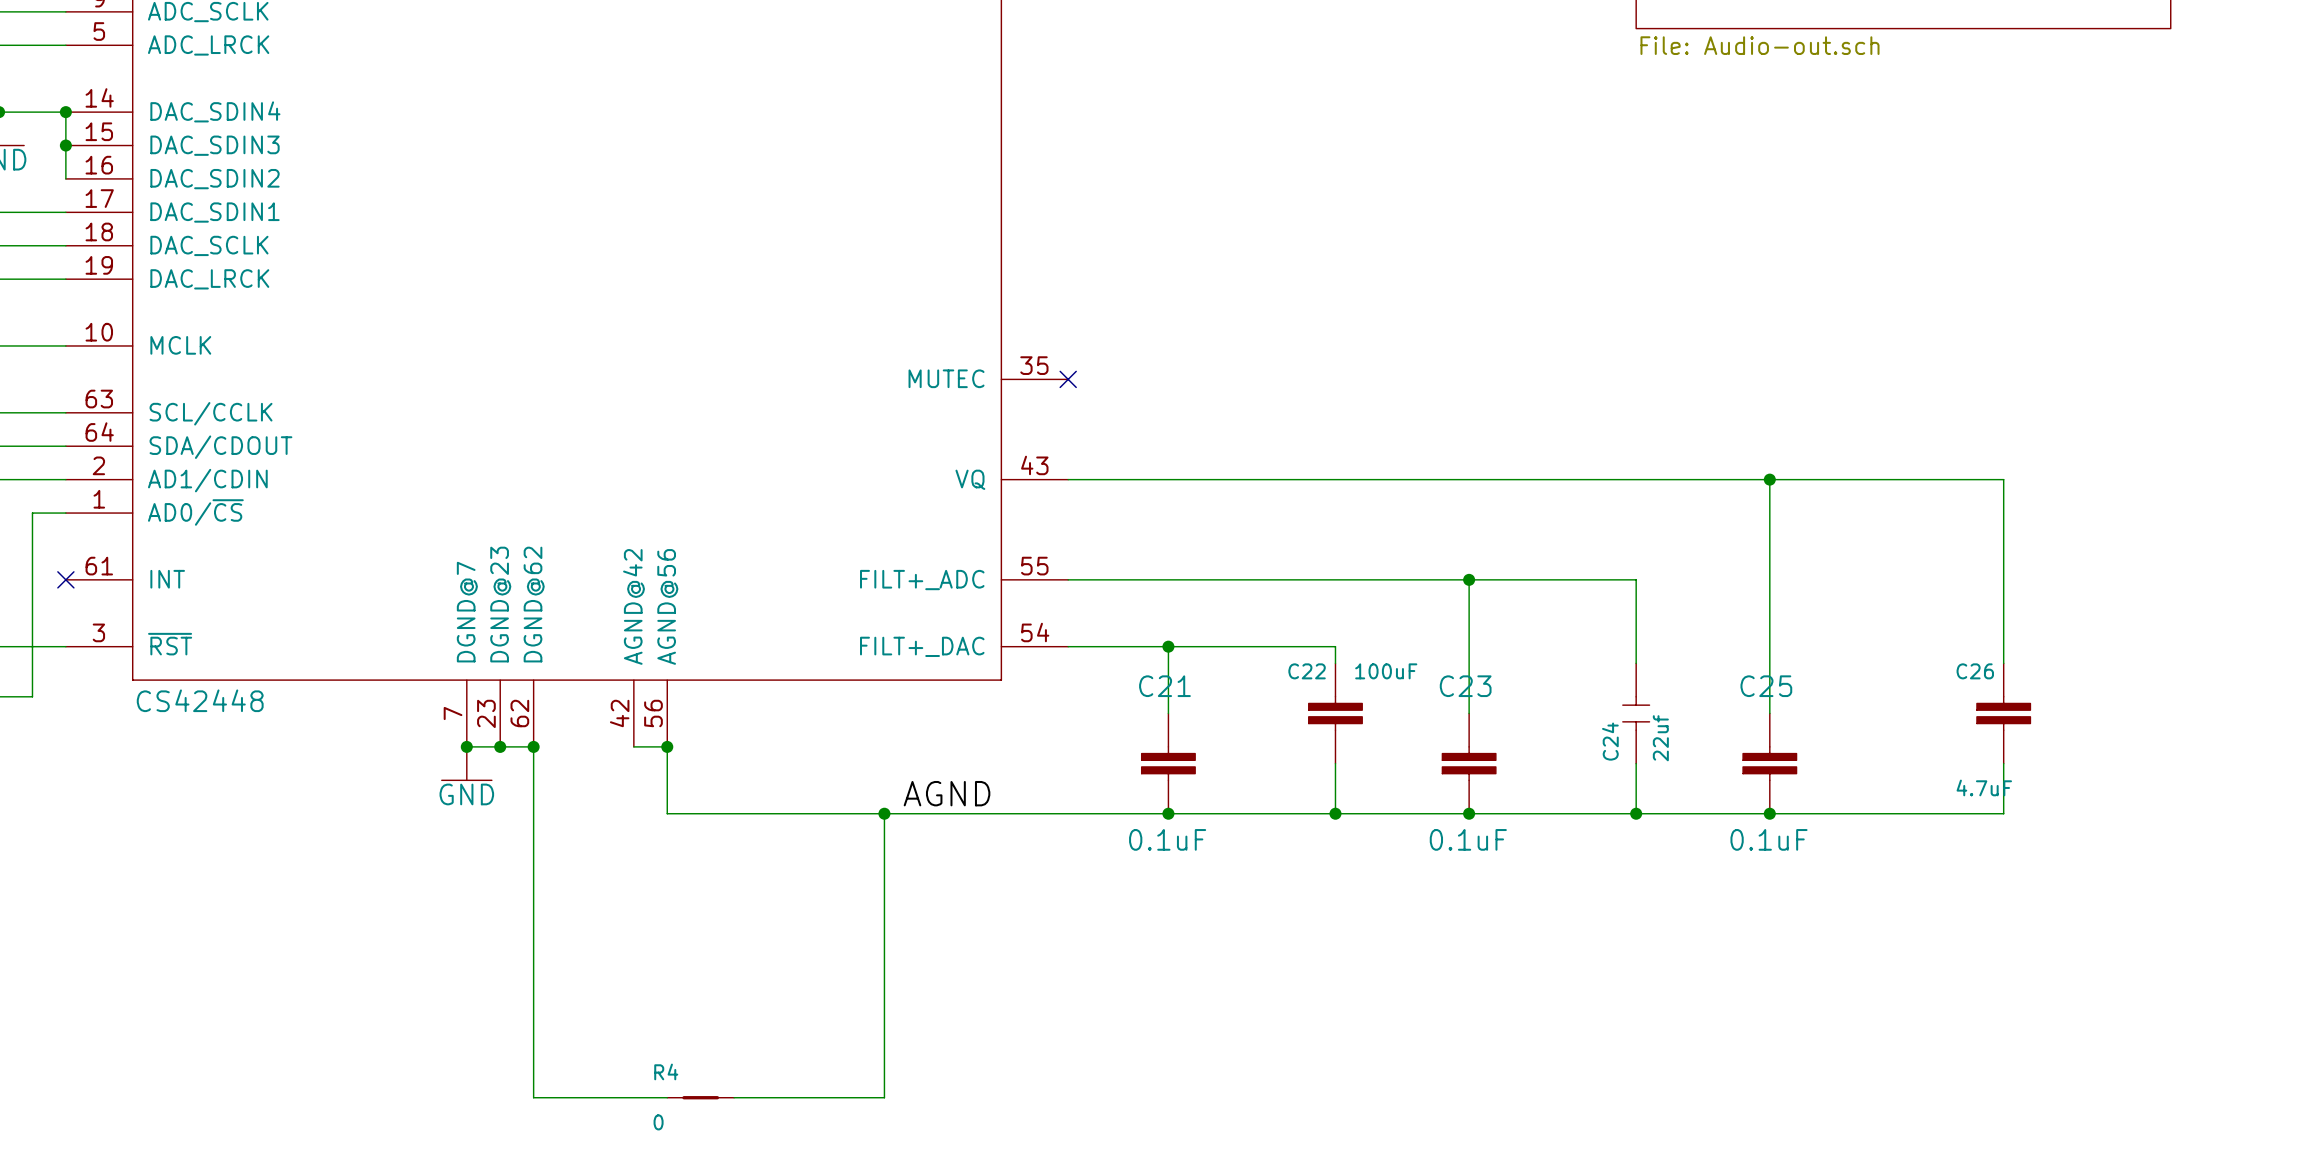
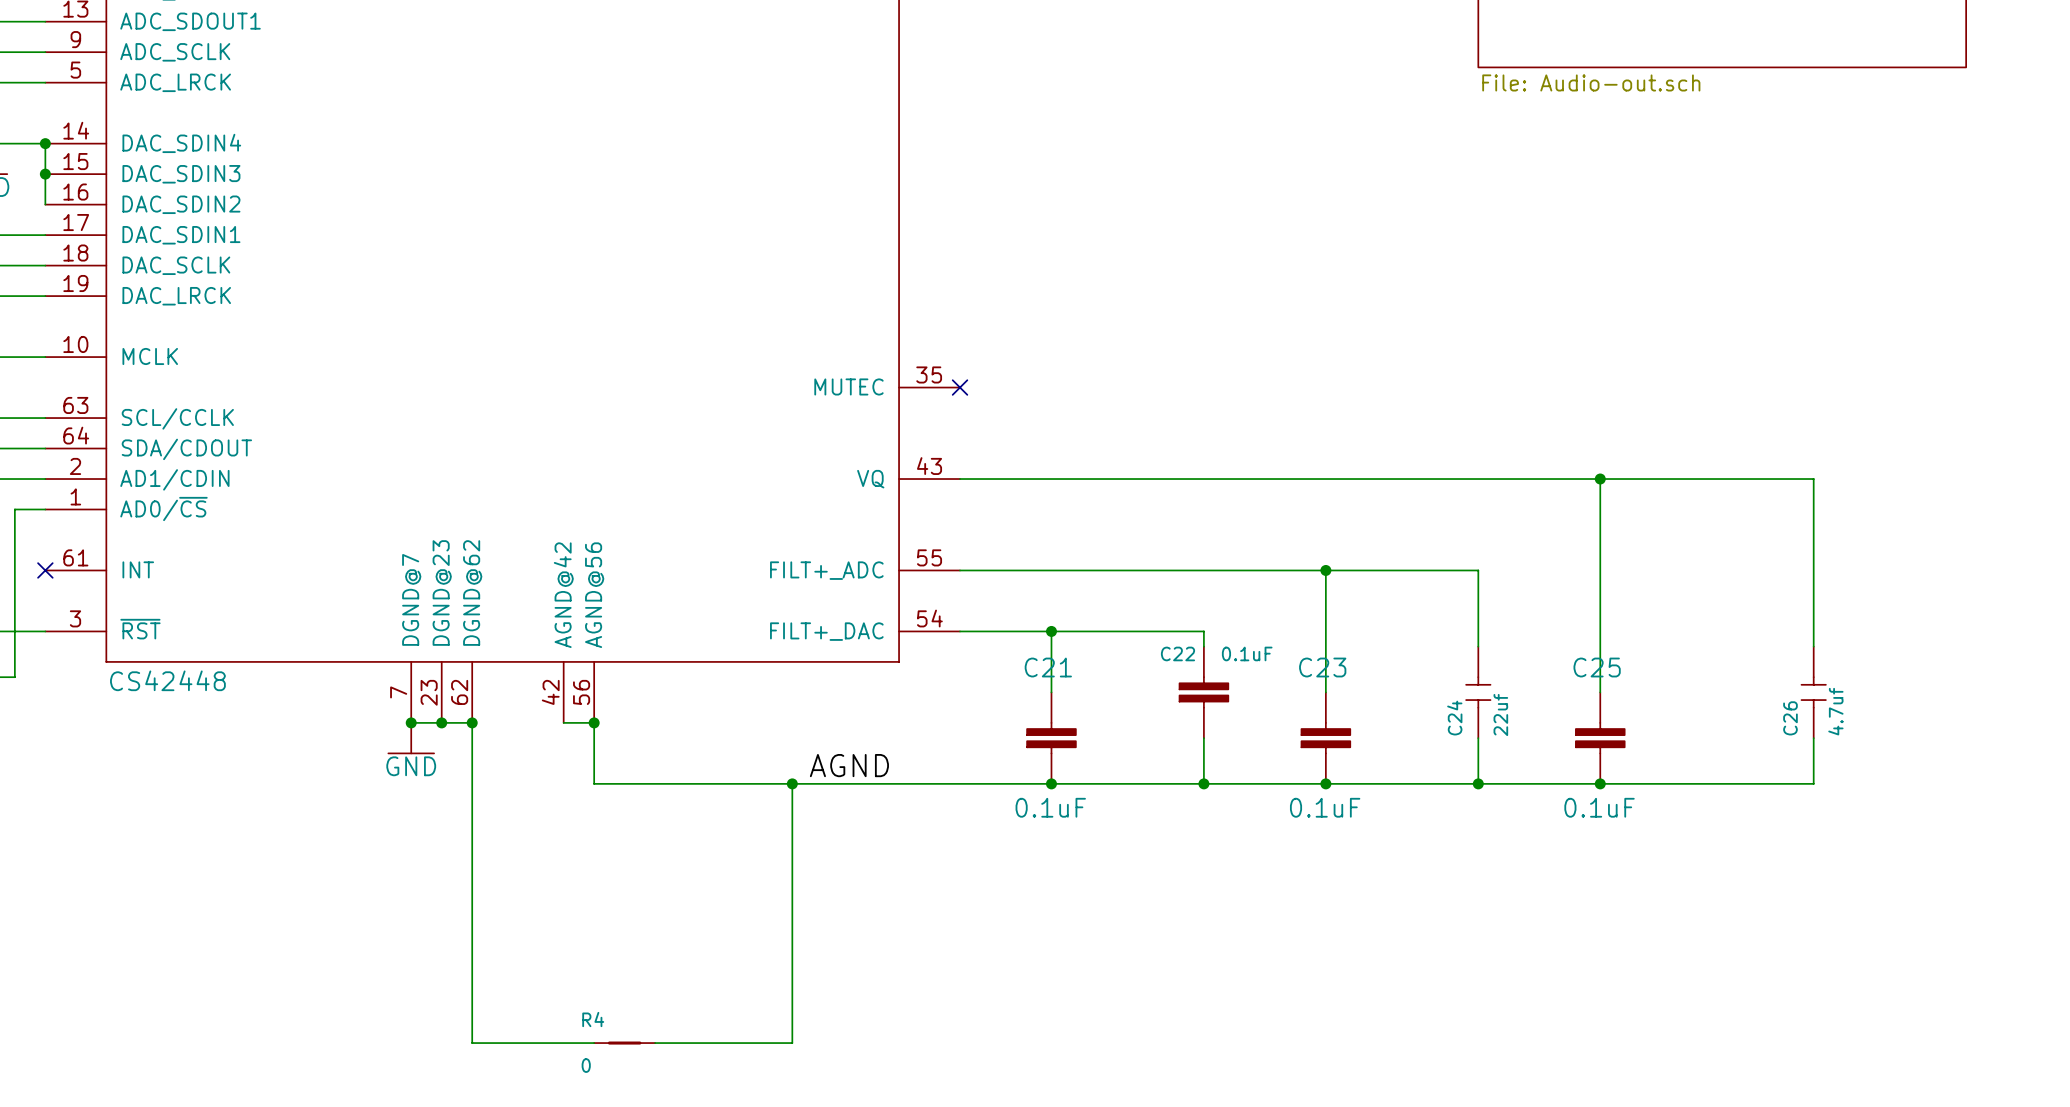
C26 symbol: [1976, 663, 2031, 764] -> [1801, 646, 1826, 739]
C22 value: 100uF (1386, 671) -> 0.1uF (1247, 653)
C26 name position: C26 (1975, 671) -> C26 (1790, 718)
C26 value: 4.7uF (1984, 787) -> 4.7uf (1835, 711)

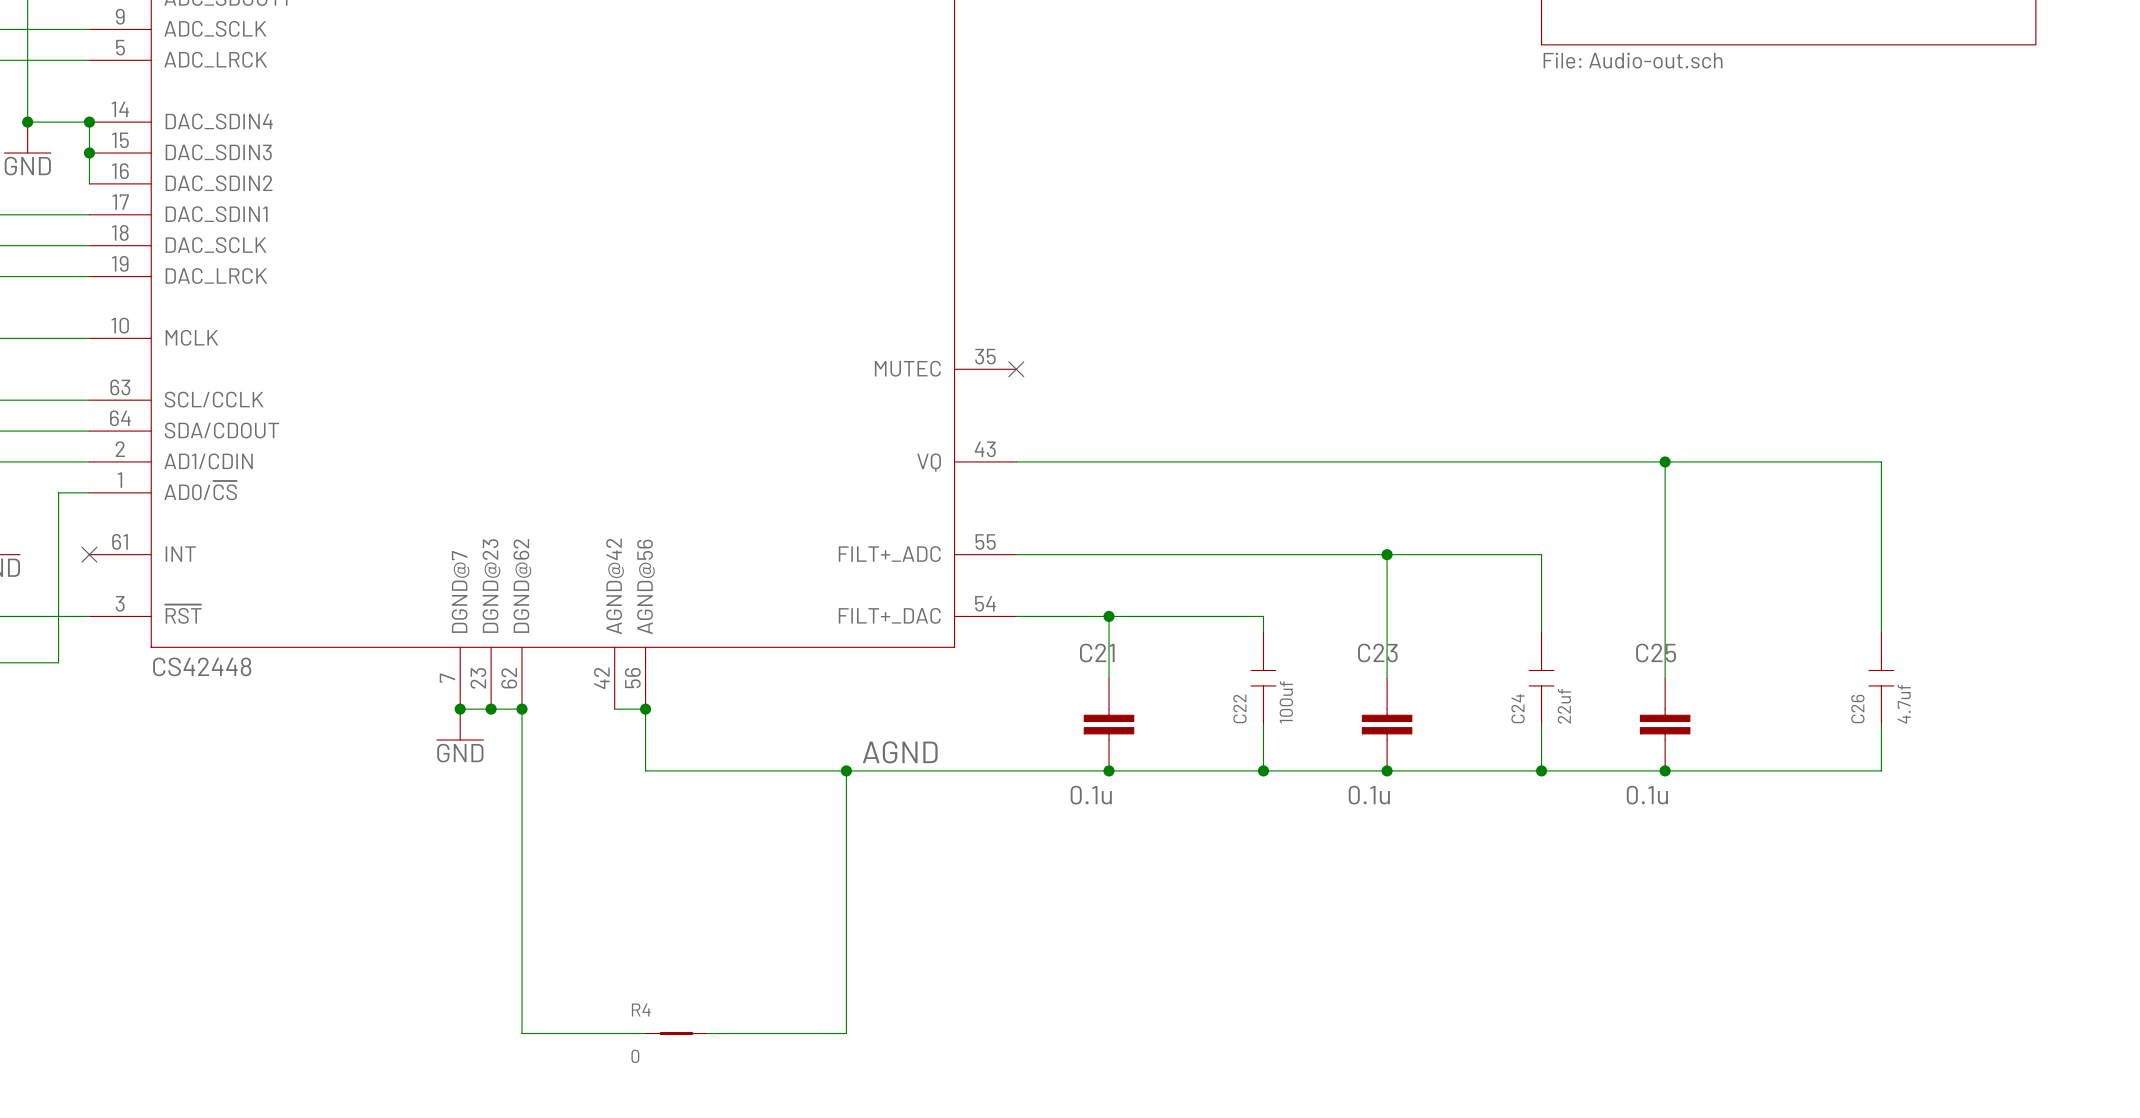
C22 symbol: [1179, 646, 1229, 739] -> [1251, 631, 1276, 725]
C22 name position: C22 (1177, 653) -> C22 (1239, 708)
C22 value: 0.1uF (1247, 653) -> 100uf (1286, 702)
C21 value: 0.1uF (1050, 807) -> 0.1u (1091, 795)
C23 value: 0.1uF (1325, 807) -> 0.1u (1369, 795)
C25 value: 0.1uF (1599, 807) -> 0.1u (1647, 795)

